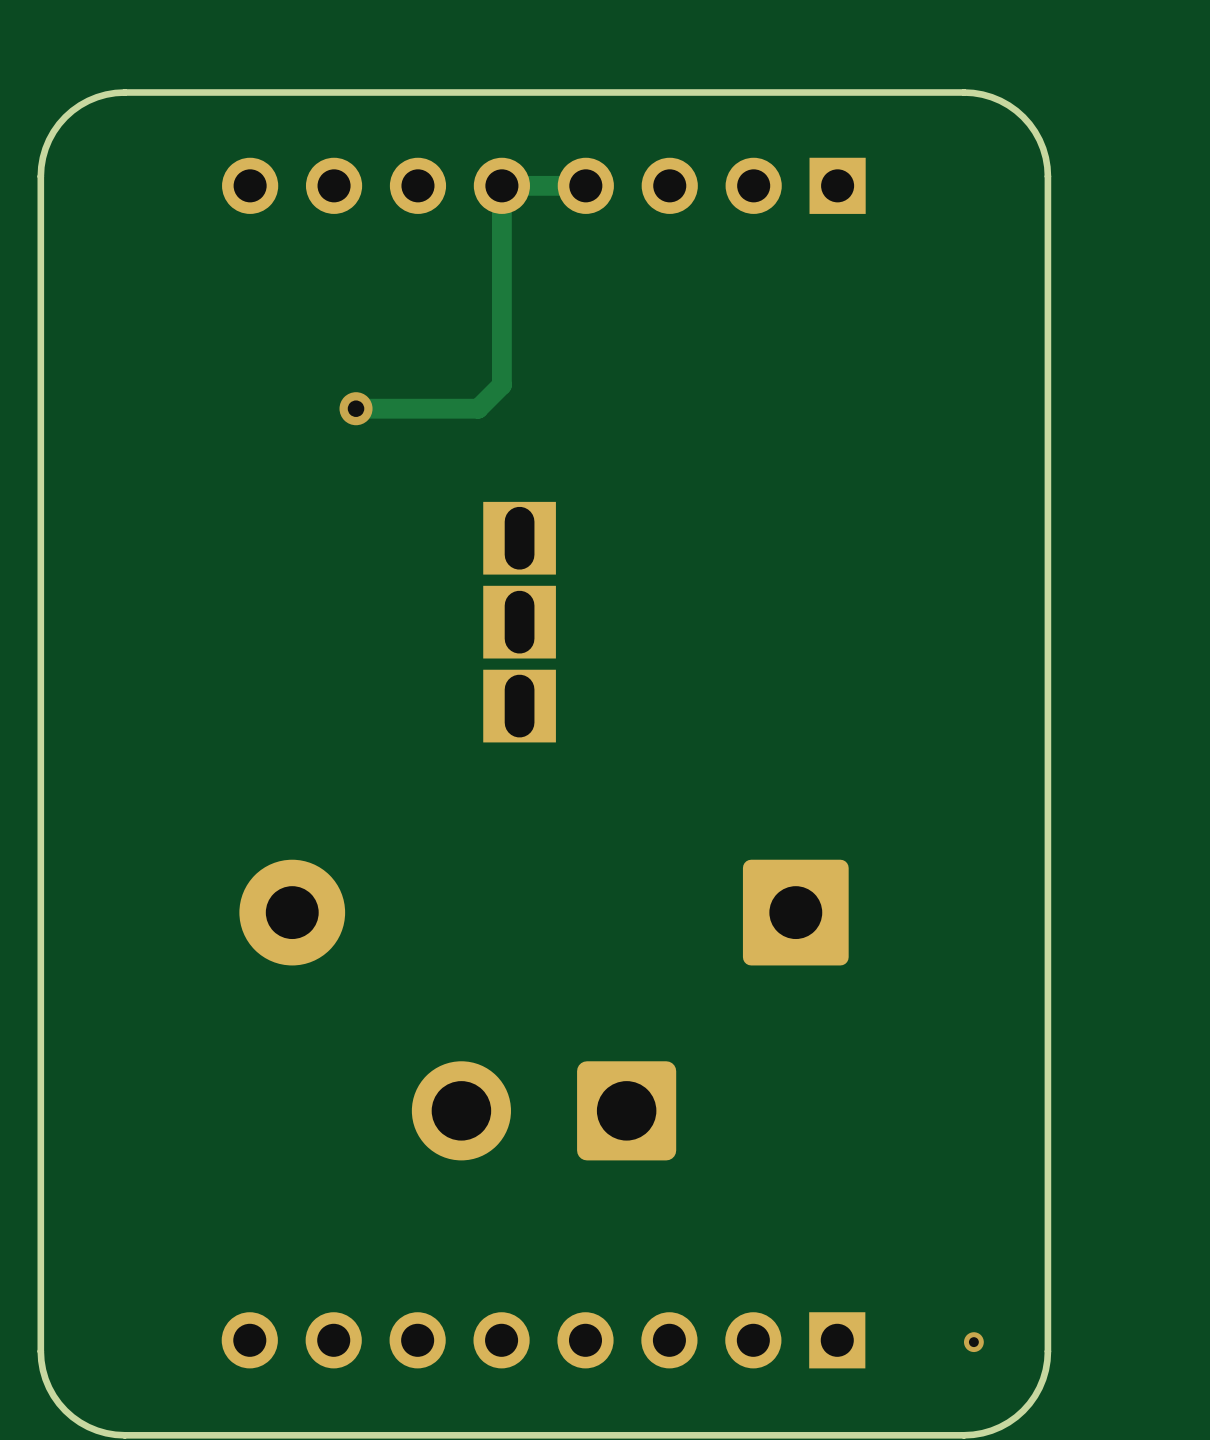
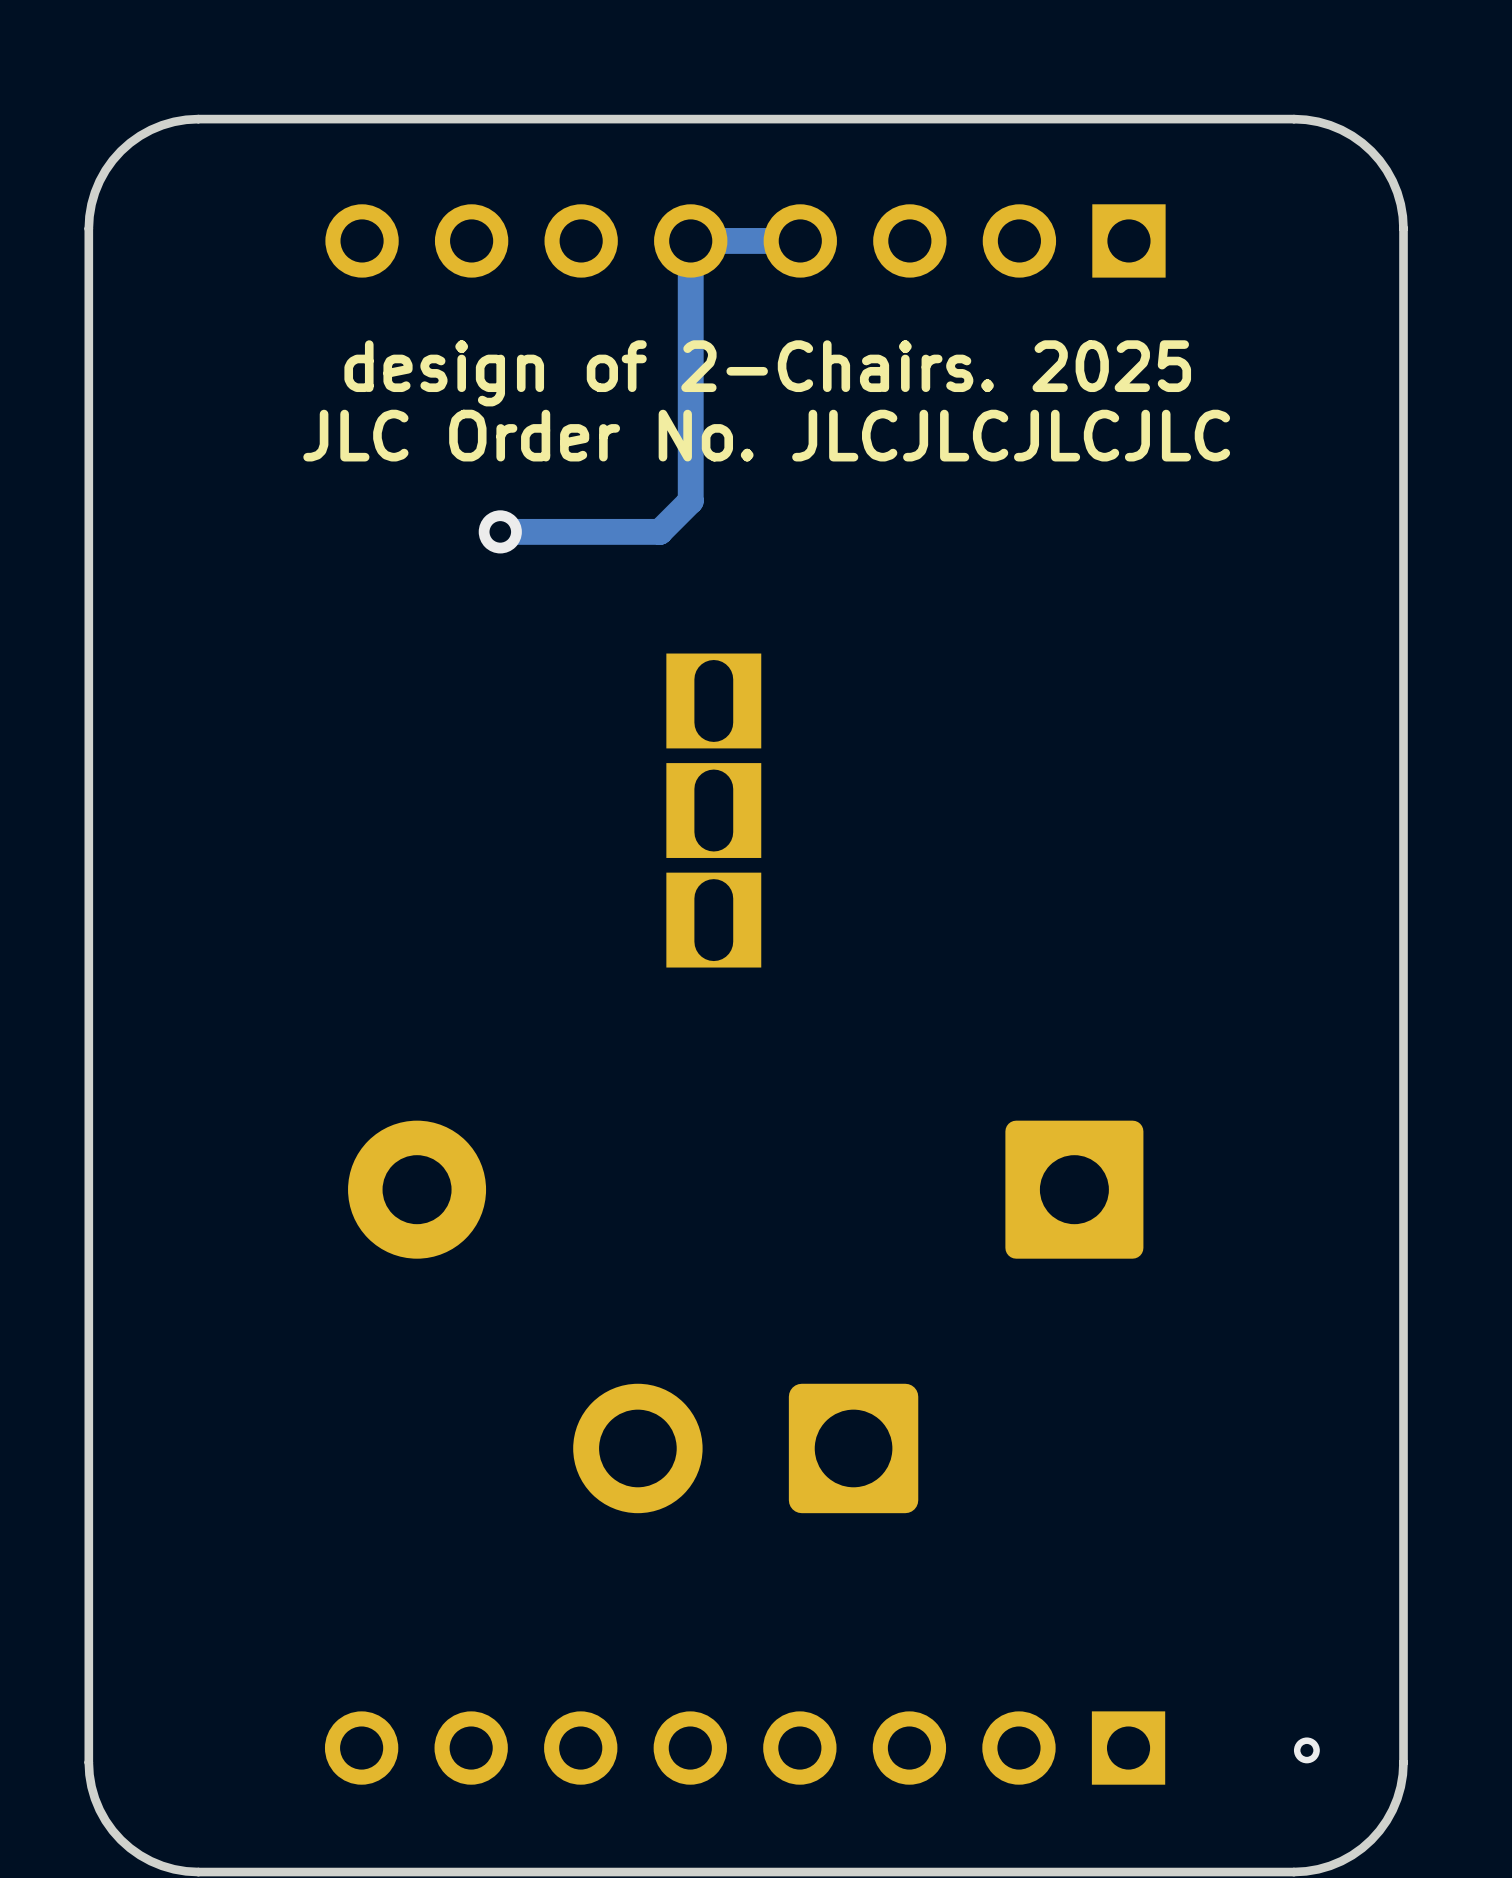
text: none -> design of 2-Chairs. 2025 (767, 373)
text: none -> JLC Order No. JLCJLCJLCJLC (766, 435)

